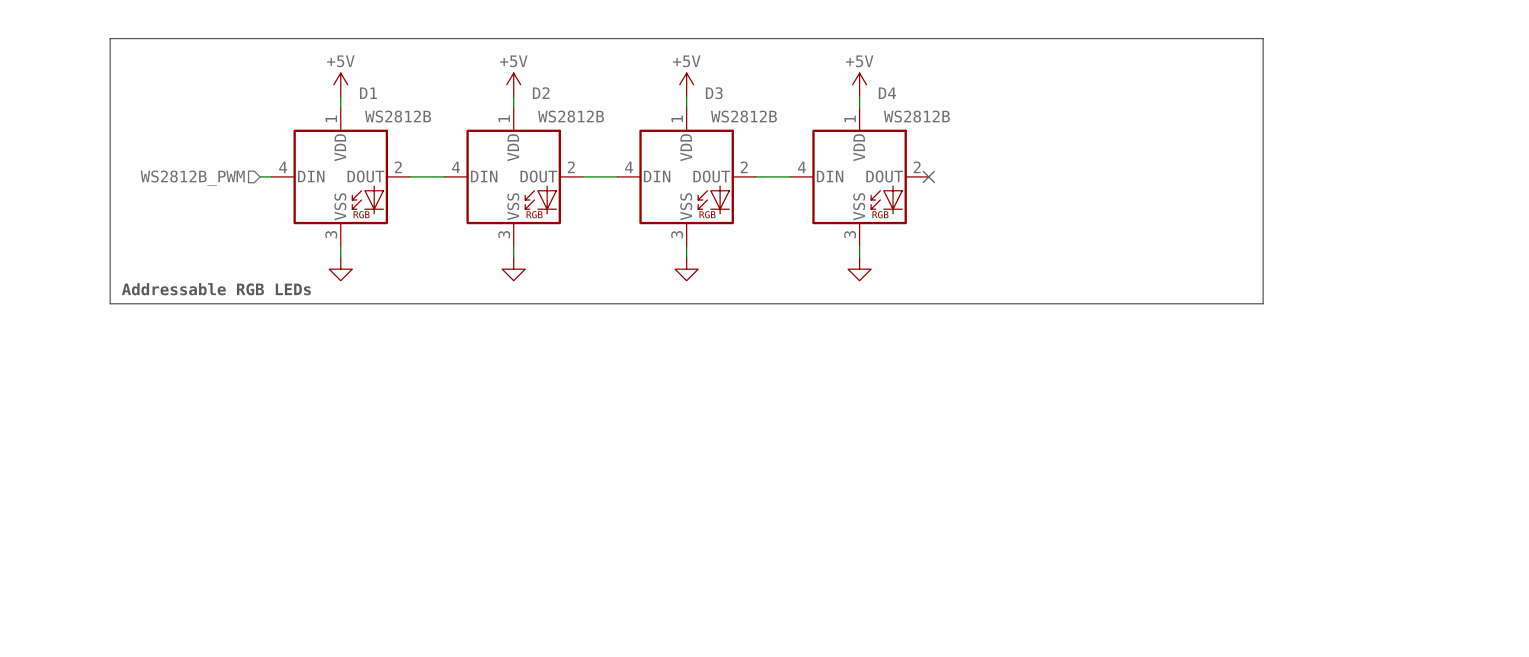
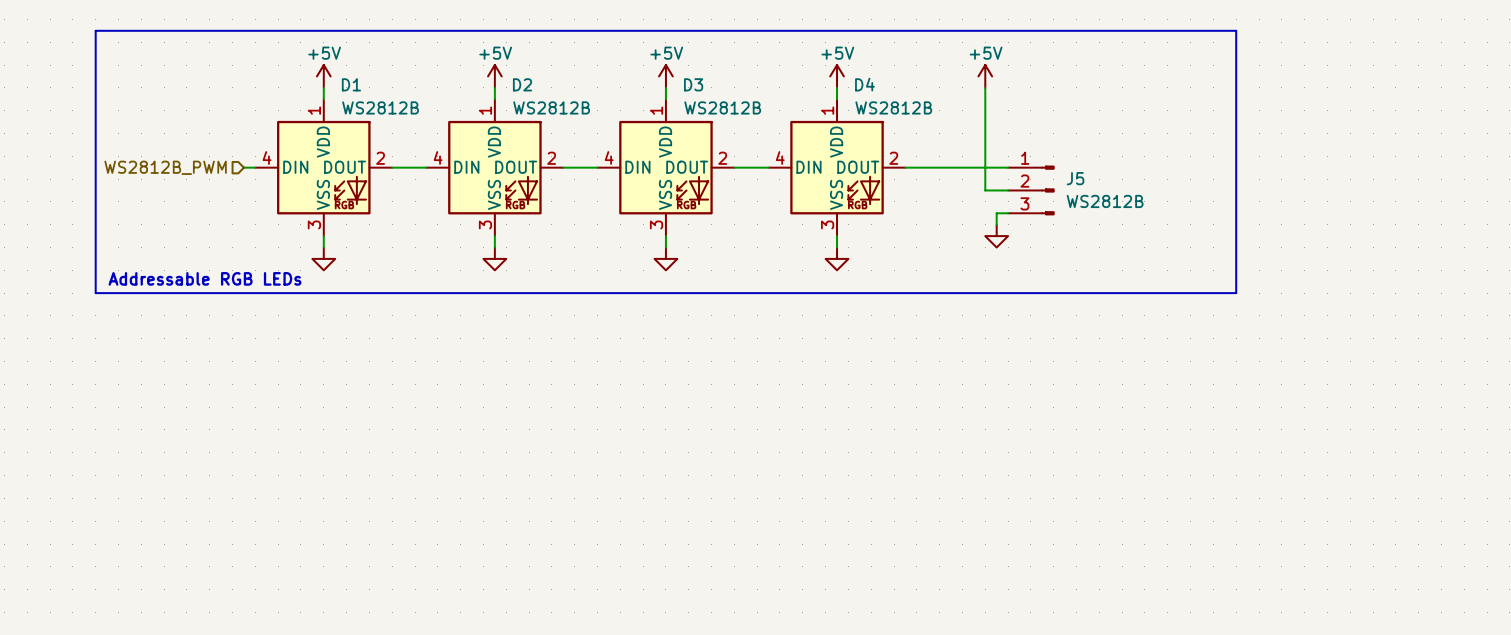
power symbol: none -> +5V (985, 76)
wire: none -> (985, 87) (985, 190) (1008, 190)
wire: none -> (905, 167) (1008, 167)
no-connect mark: (928, 176) -> none
J5: none -> WS2812B (1031, 190)
wire: none -> (1008, 213) (996, 213) (996, 224)
power symbol: none -> (996, 236)

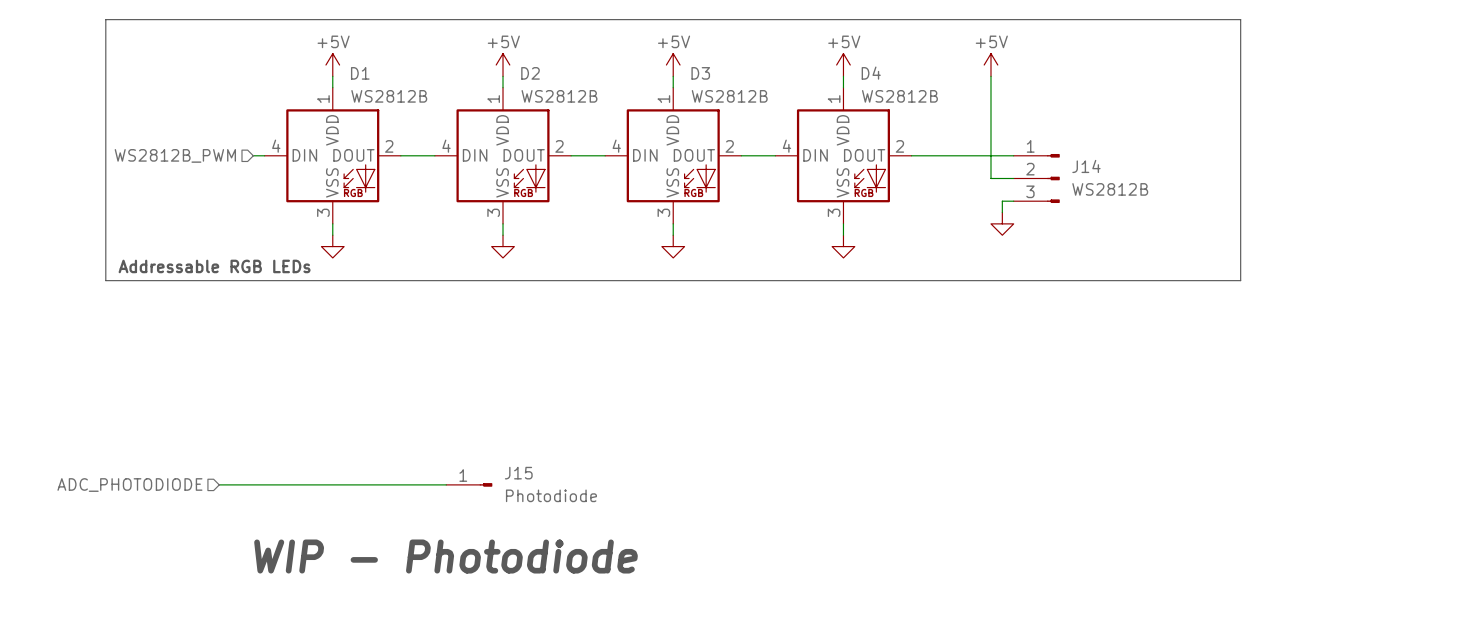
J5 name: J5 (1075, 178) -> J14 (1086, 166)
hierarchical label: none -> ADC_PHOTODIODE (129, 485)
wire: none -> (219, 484) (446, 484)
J15: none -> Photodiode (469, 484)
text: none -> WIP - Photodiode (446, 556)

